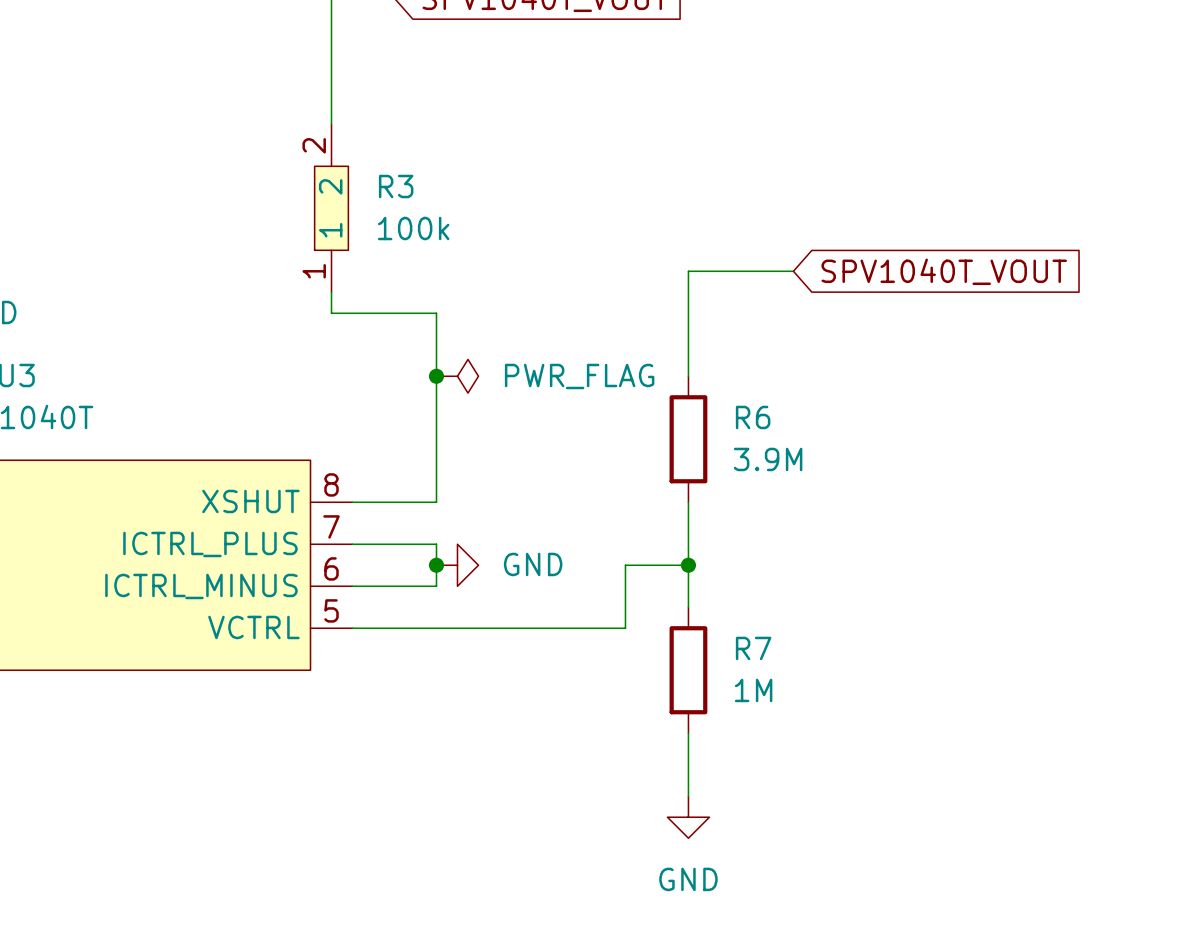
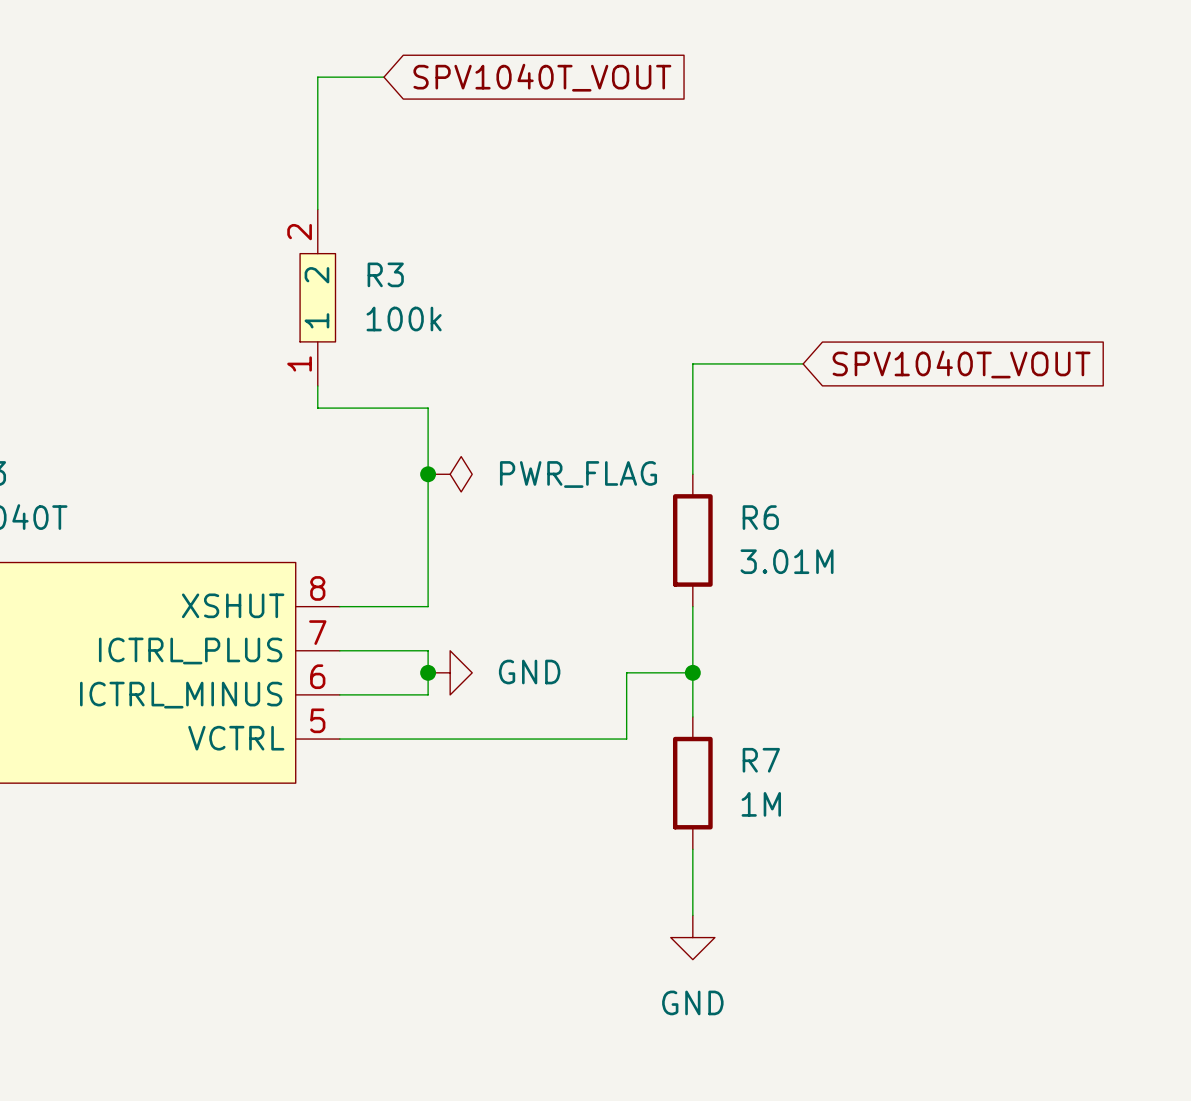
R6 value: 3.9M (768, 459) -> 3.01M (787, 561)

